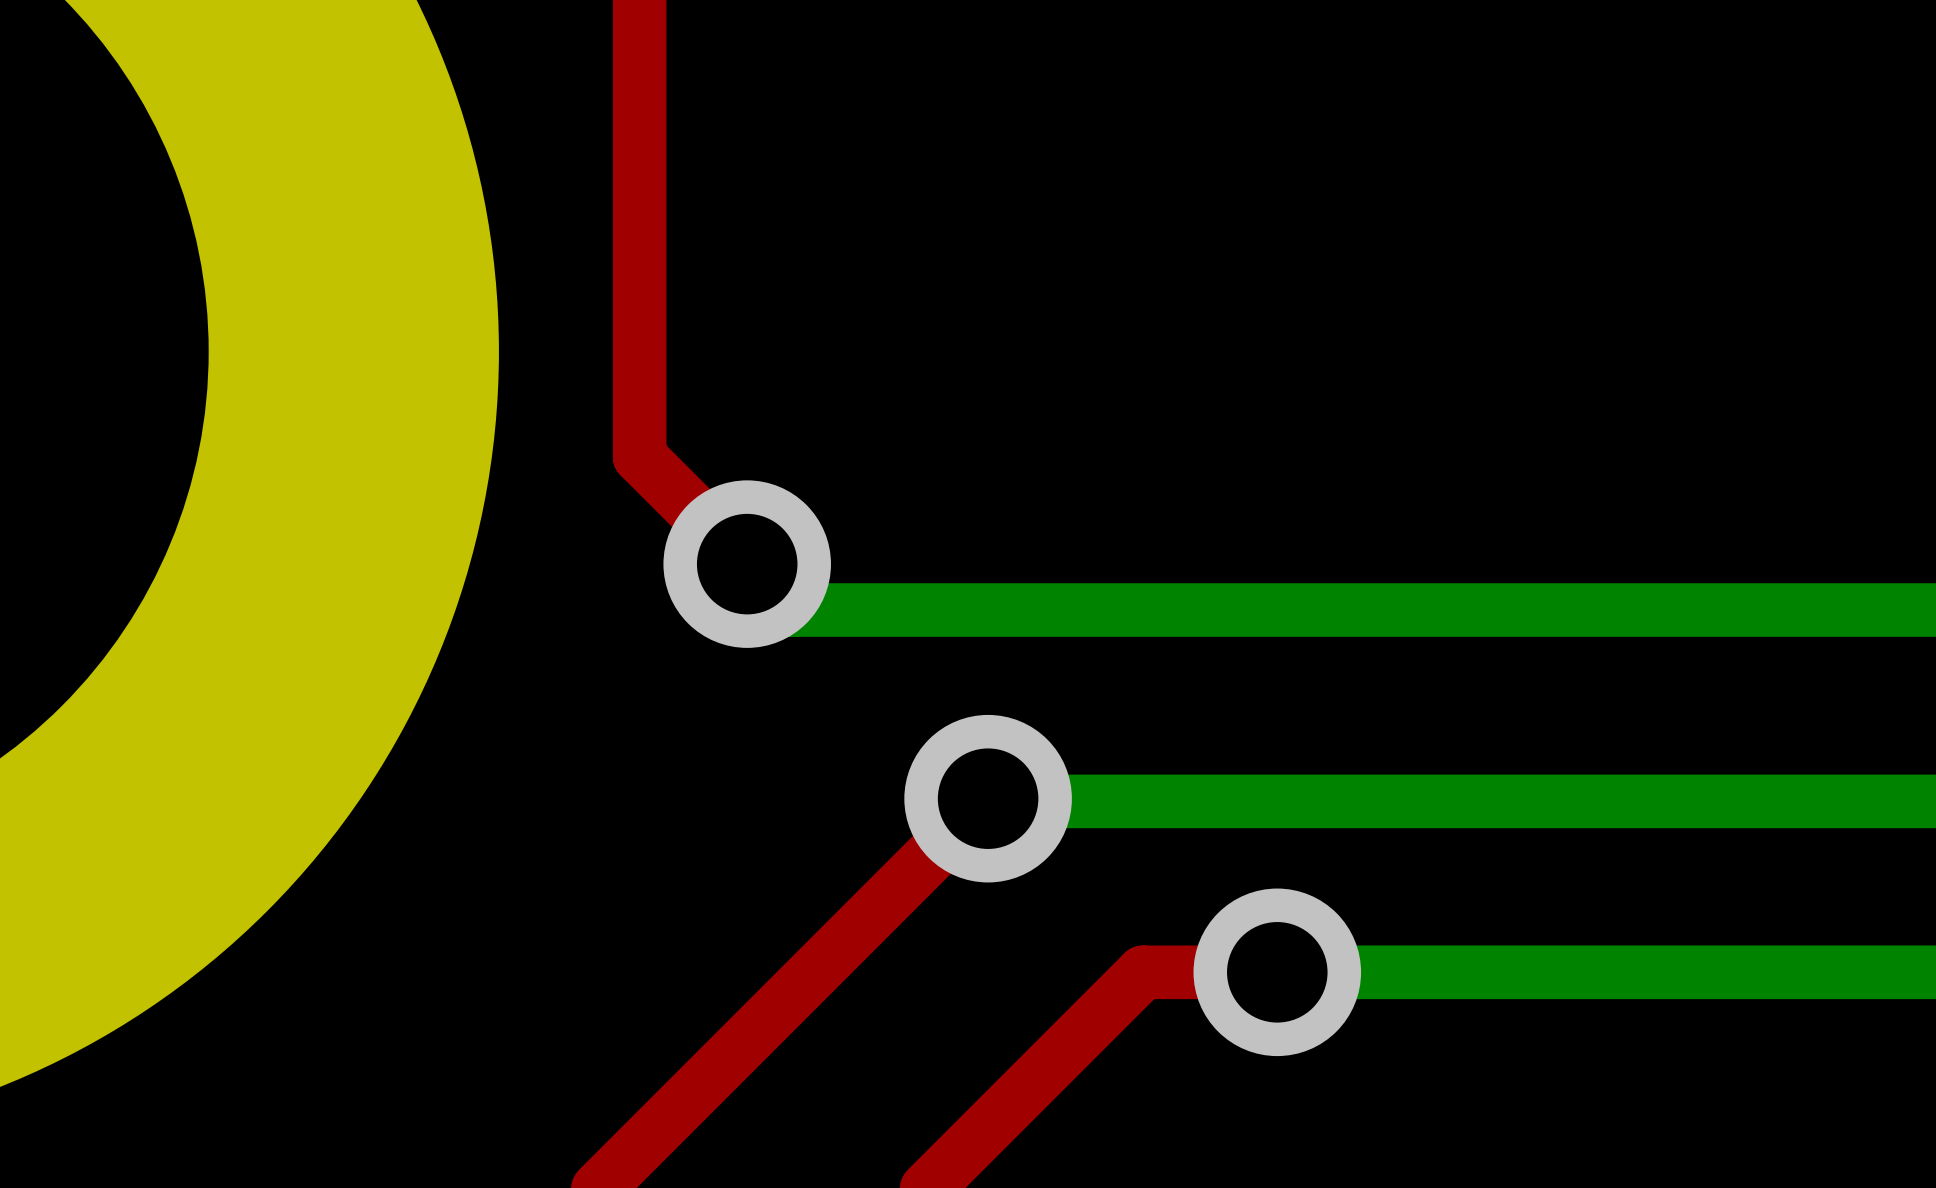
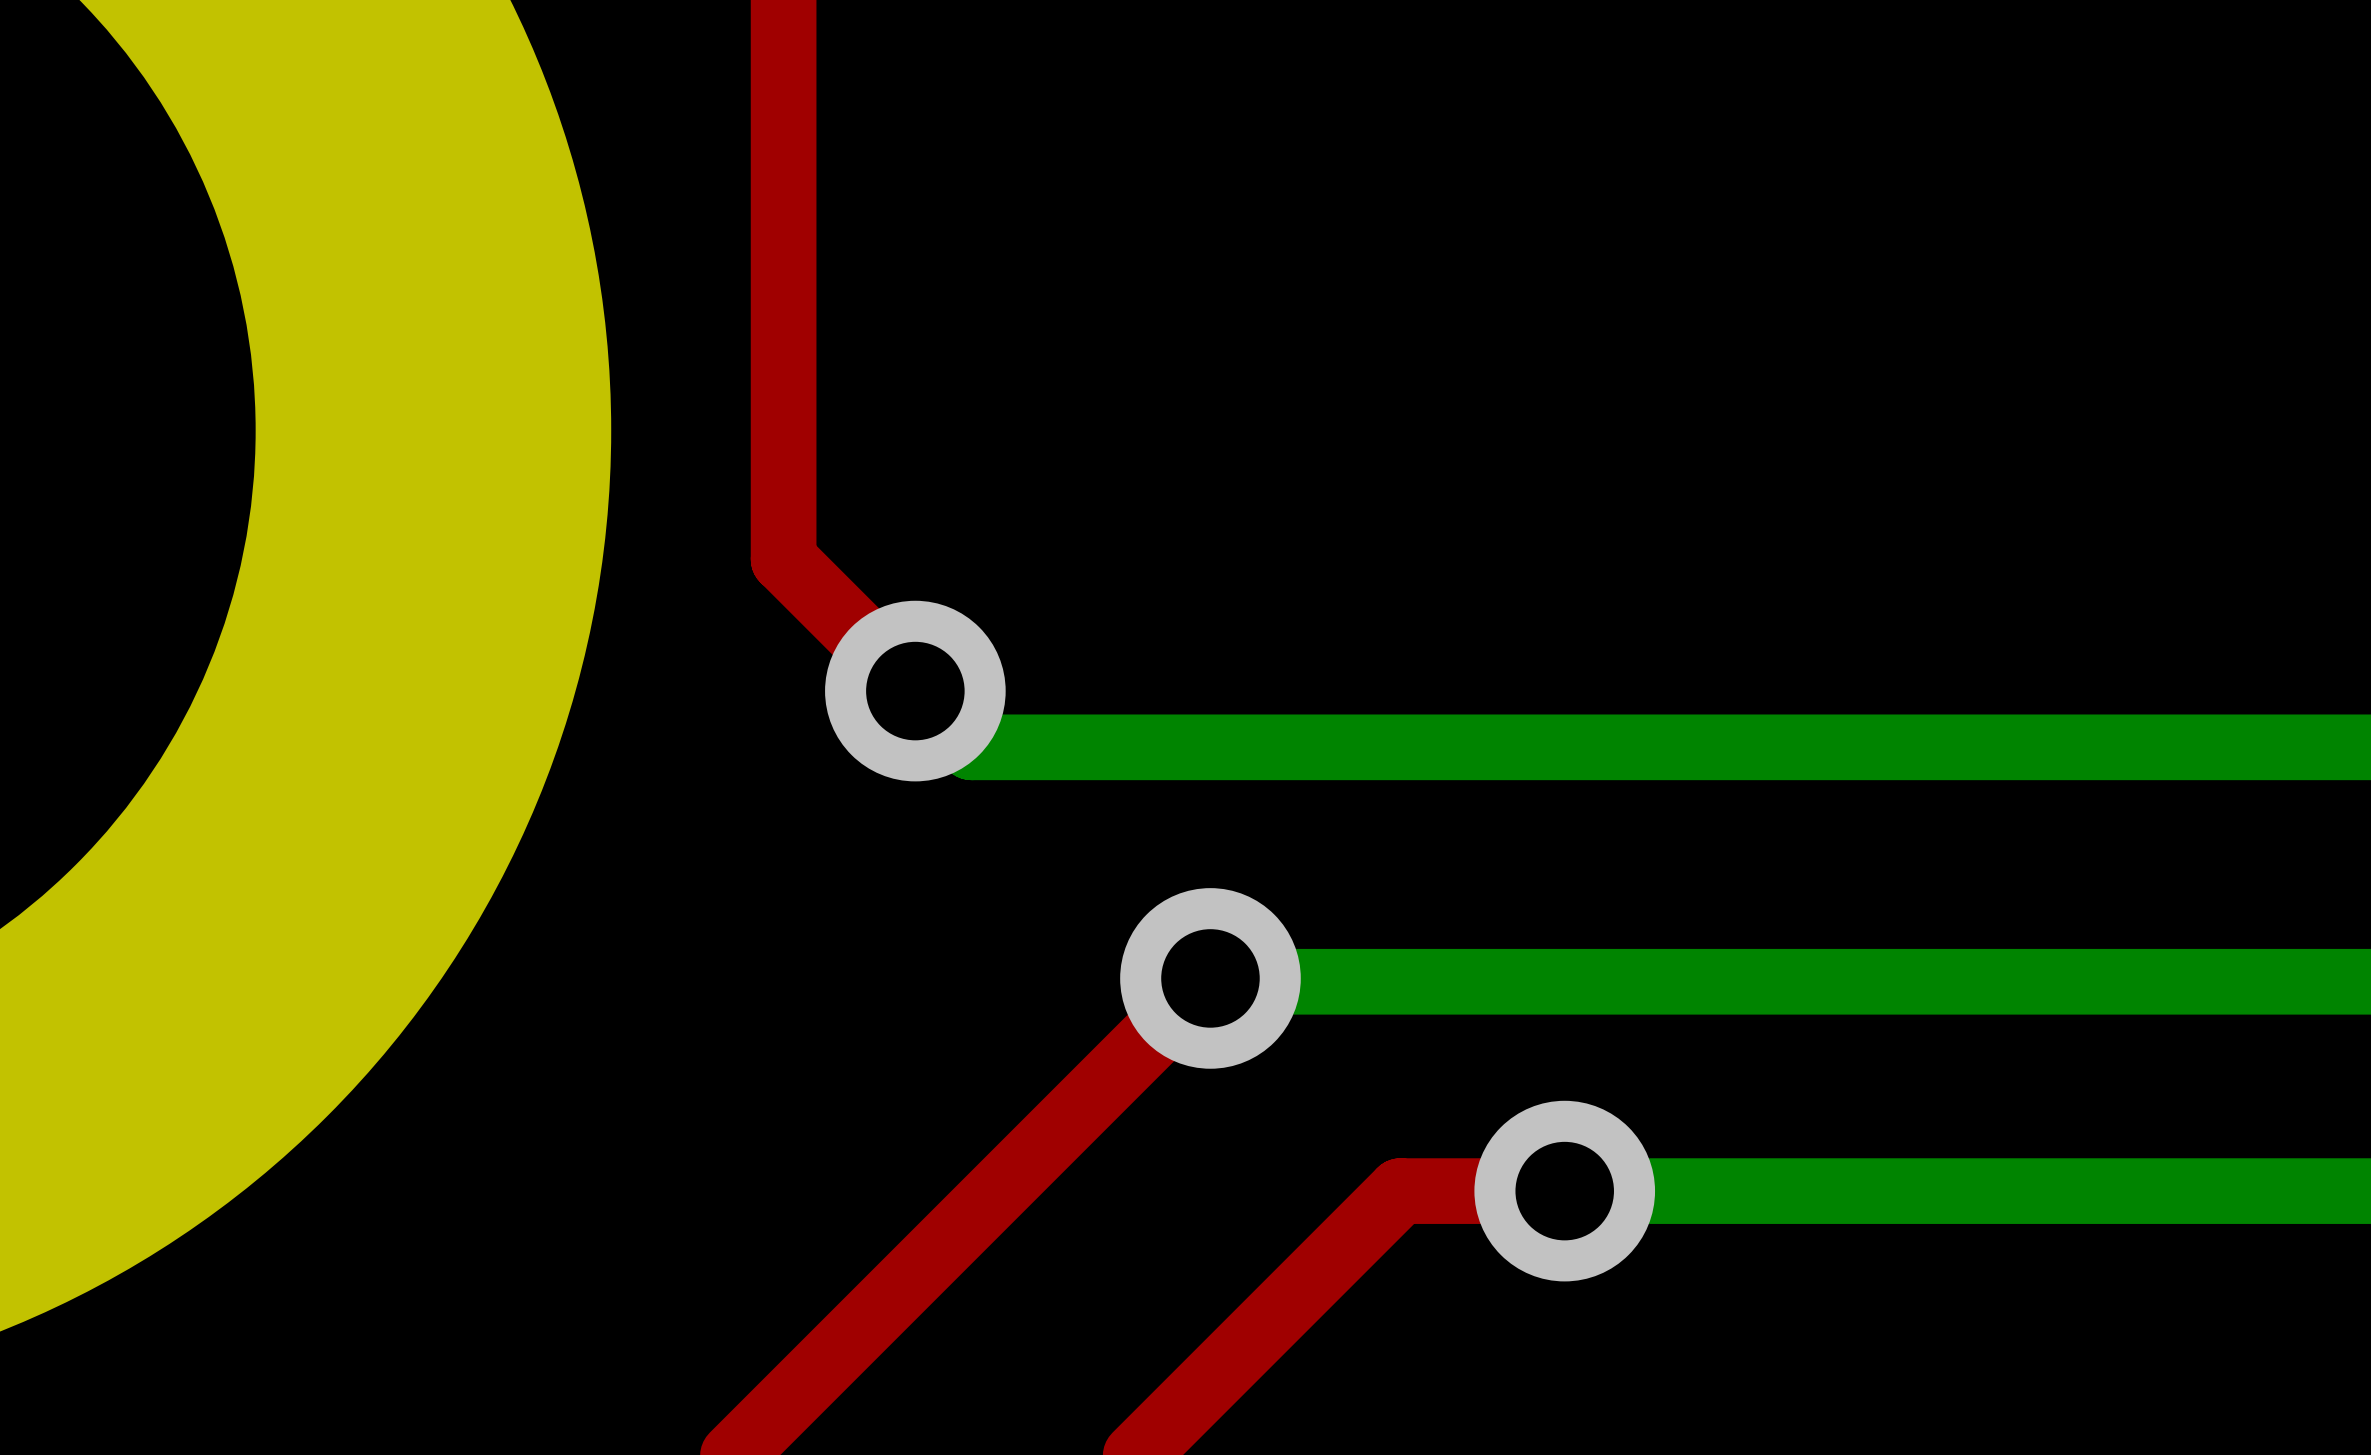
via size: [663, 480, 831, 648] -> [825, 600, 1006, 782]
via size: [904, 714, 1072, 883] -> [1120, 888, 1301, 1069]
via size: [1193, 888, 1362, 1057] -> [1474, 1100, 1656, 1282]

